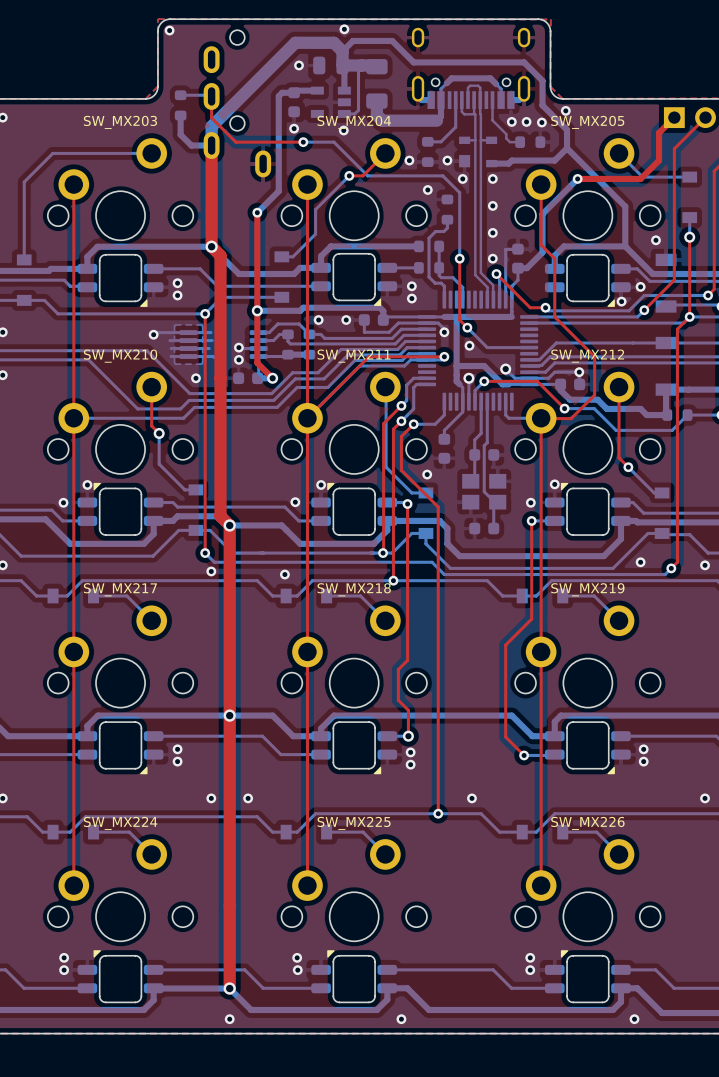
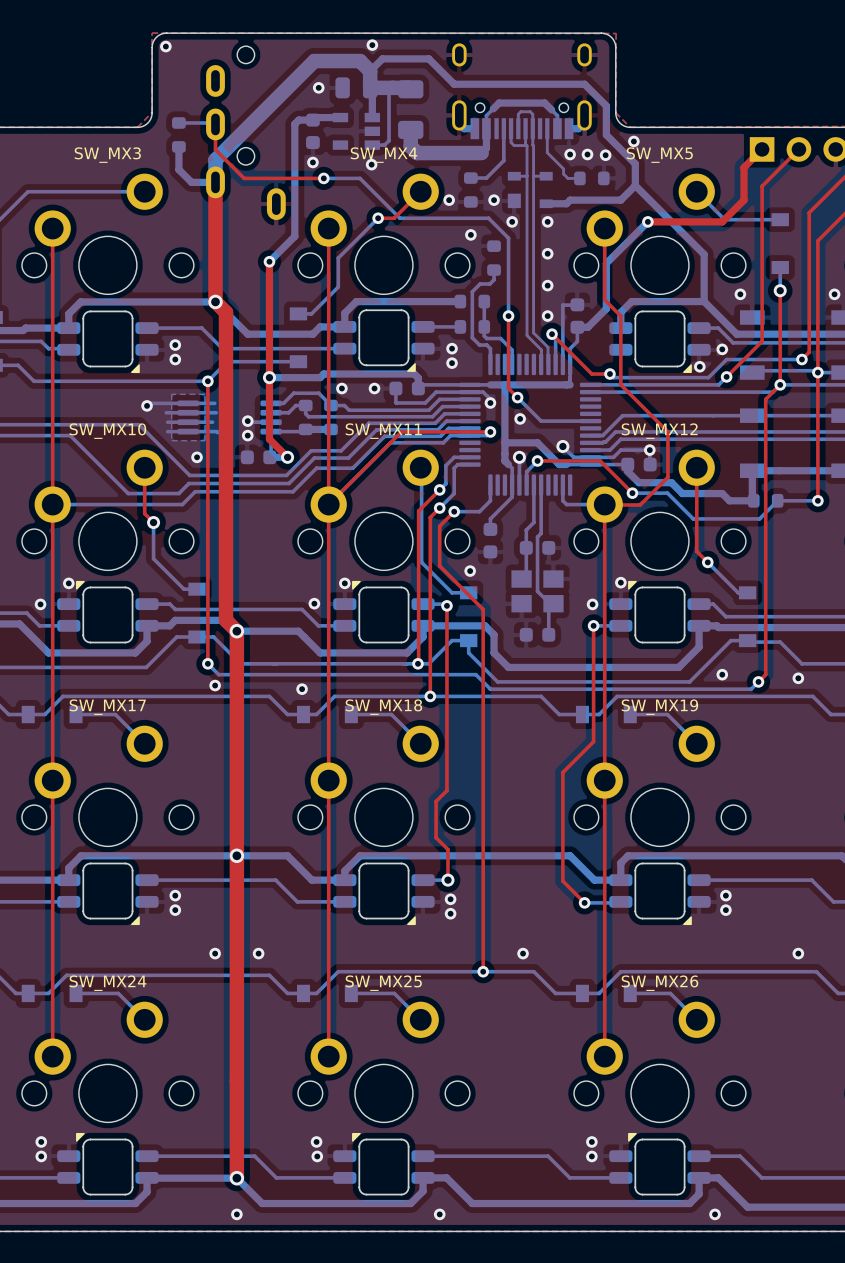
SW_MX203 name: SW_MX203 (120, 122) -> SW_MX3 (107, 155)
SW_MX204 name: SW_MX204 (354, 122) -> SW_MX4 (384, 155)
SW_MX205 name: SW_MX205 (587, 122) -> SW_MX5 (659, 155)
SW_MX210 name: SW_MX210 (120, 356) -> SW_MX10 (107, 431)
SW_MX211 name: SW_MX211 (354, 356) -> SW_MX11 (383, 431)
SW_MX212 name: SW_MX212 (587, 356) -> SW_MX12 (659, 431)
SW_MX217 name: SW_MX217 (120, 589) -> SW_MX17 (107, 707)
SW_MX218 name: SW_MX218 (354, 589) -> SW_MX18 (383, 707)
SW_MX219 name: SW_MX219 (587, 589) -> SW_MX19 (659, 707)
SW_MX224 name: SW_MX224 (120, 823) -> SW_MX24 (107, 983)
SW_MX225 name: SW_MX225 (354, 823) -> SW_MX25 (383, 983)
SW_MX226 name: SW_MX226 (587, 823) -> SW_MX26 (659, 983)

